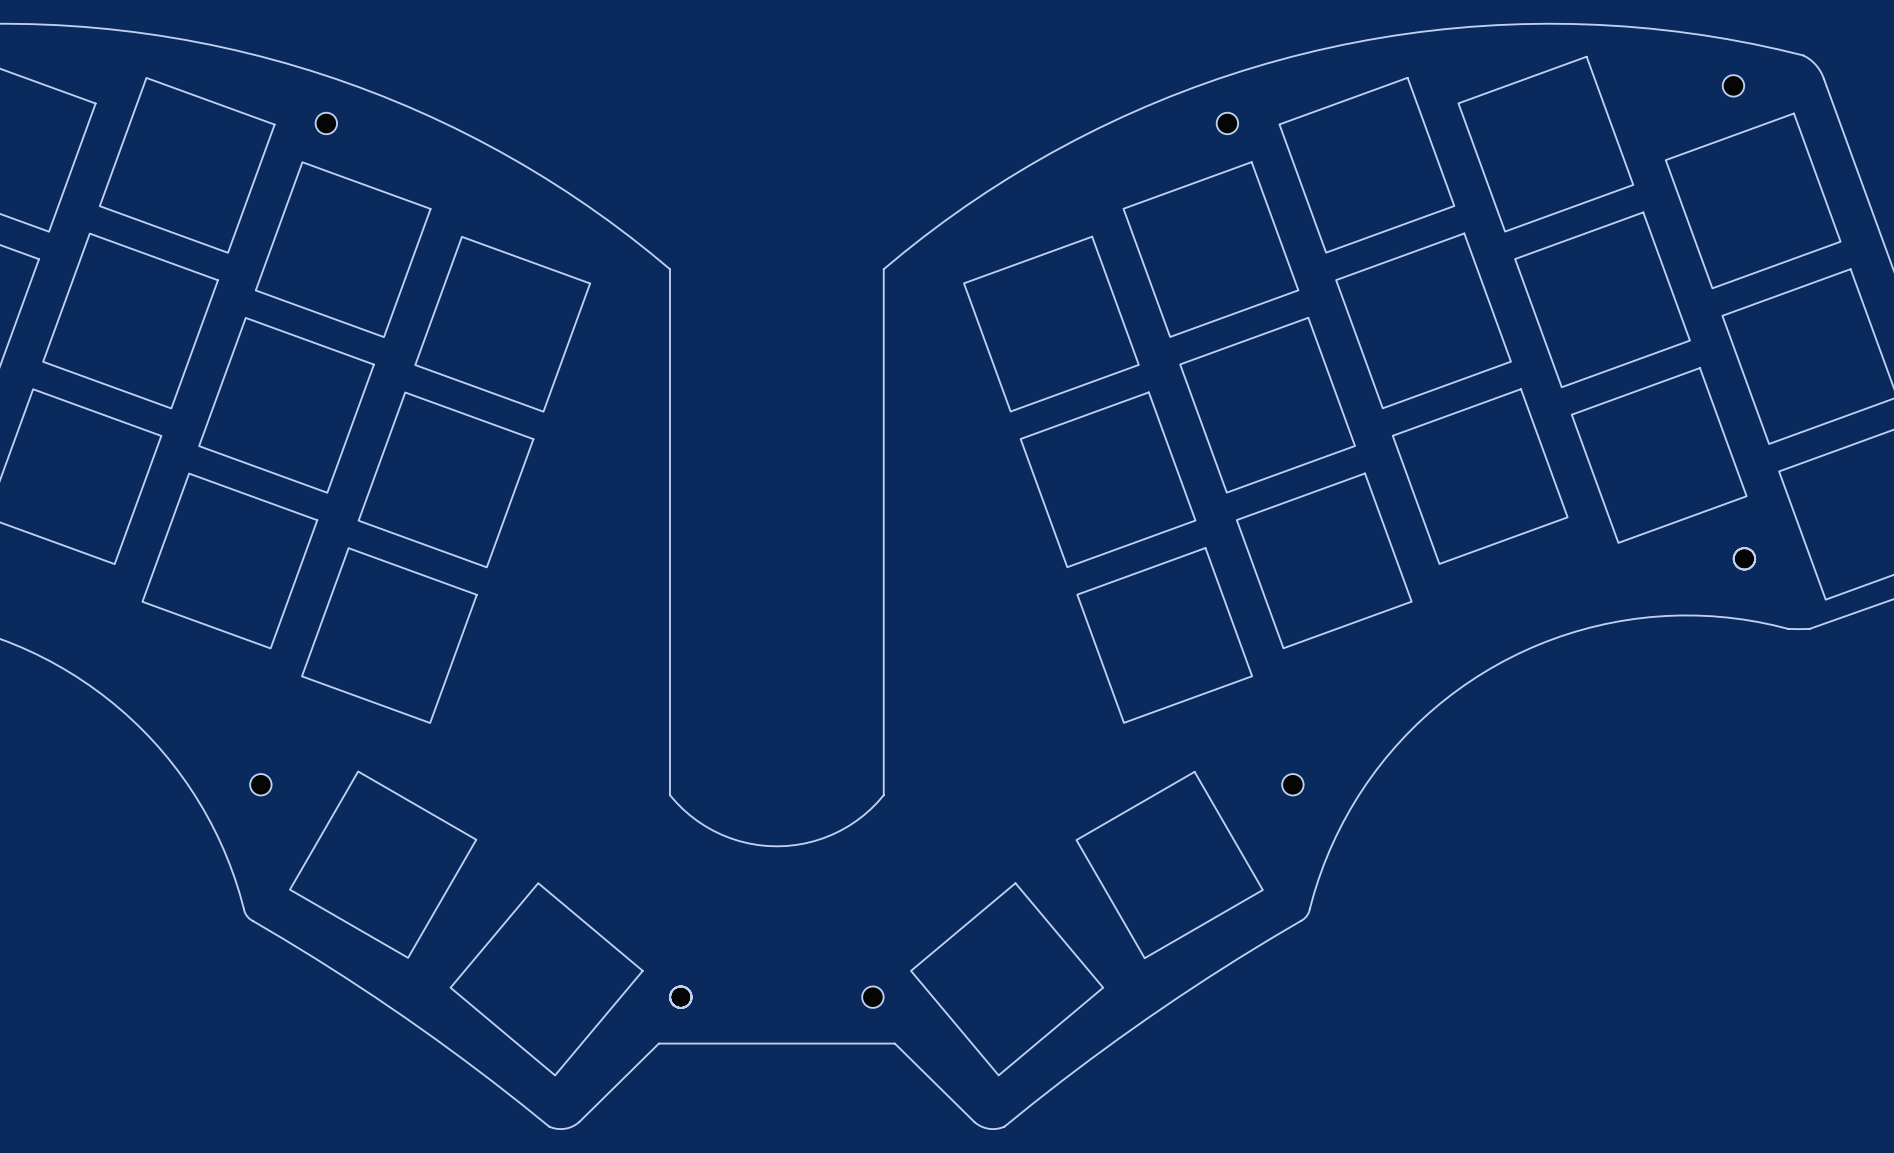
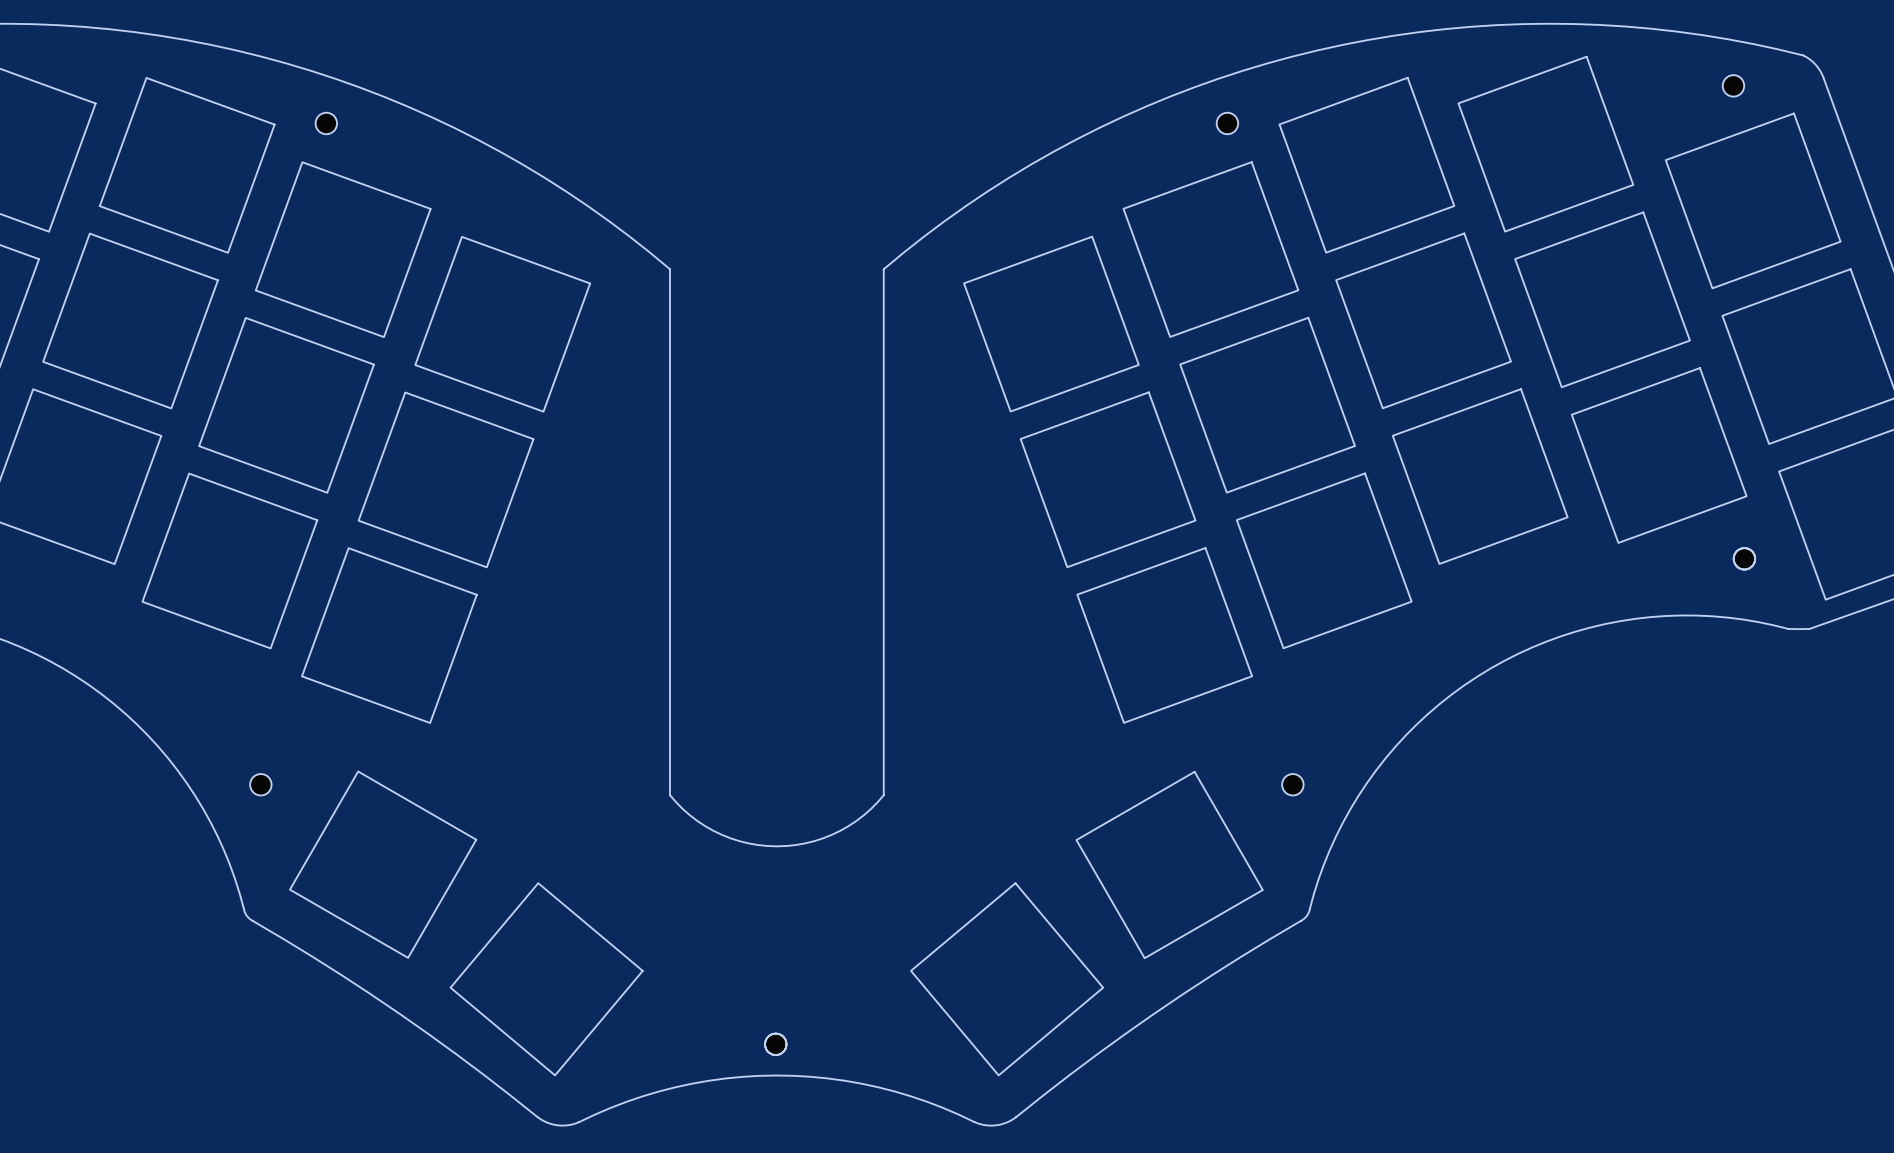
board edge: (1301, 920) (1178, 997) (1089, 1059) (1004, 1126) (992, 1129) (982, 1127) (974, 1122) (894, 1043) (658, 1043) (579, 1122) (564, 1128) (552, 1127) (405, 1017) (314, 958) (252, 920) -> (1301, 920) (1183, 993) (1098, 1053) (1015, 1117) (1000, 1124) (978, 1123) (927, 1101) (878, 1087) (827, 1078) (776, 1075) (725, 1078) (675, 1087) (626, 1101) (575, 1123) (562, 1125) (541, 1119) (455, 1053) (399, 1013) (341, 975) (252, 920)
part: (680, 997) -> none
part: (872, 997) -> none
part: none -> (775, 1044)

